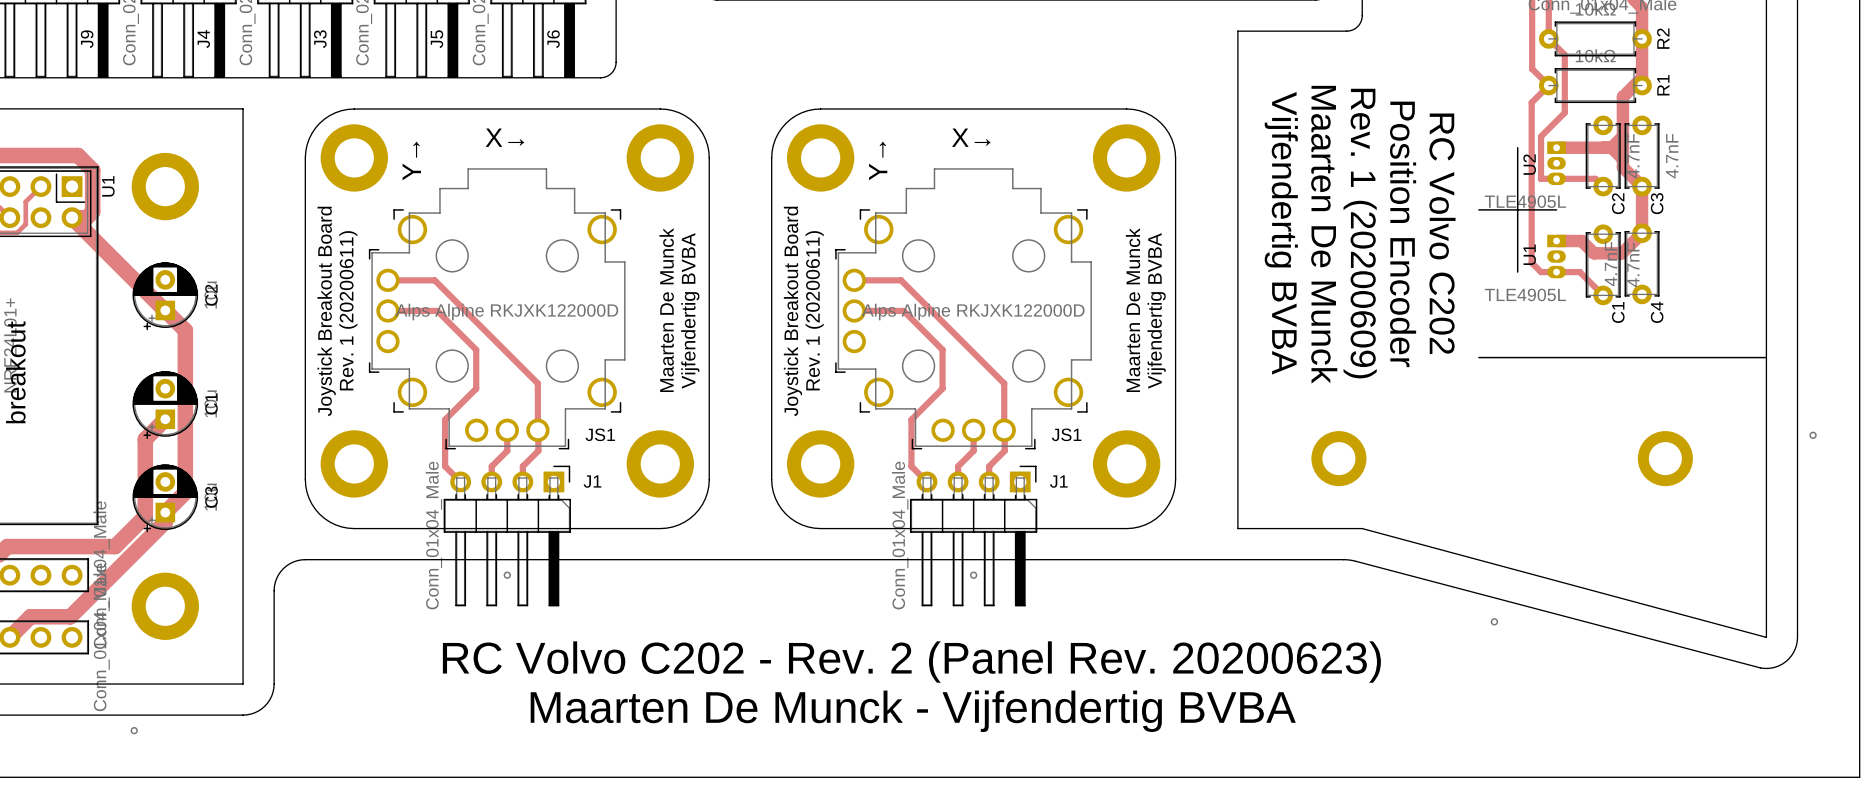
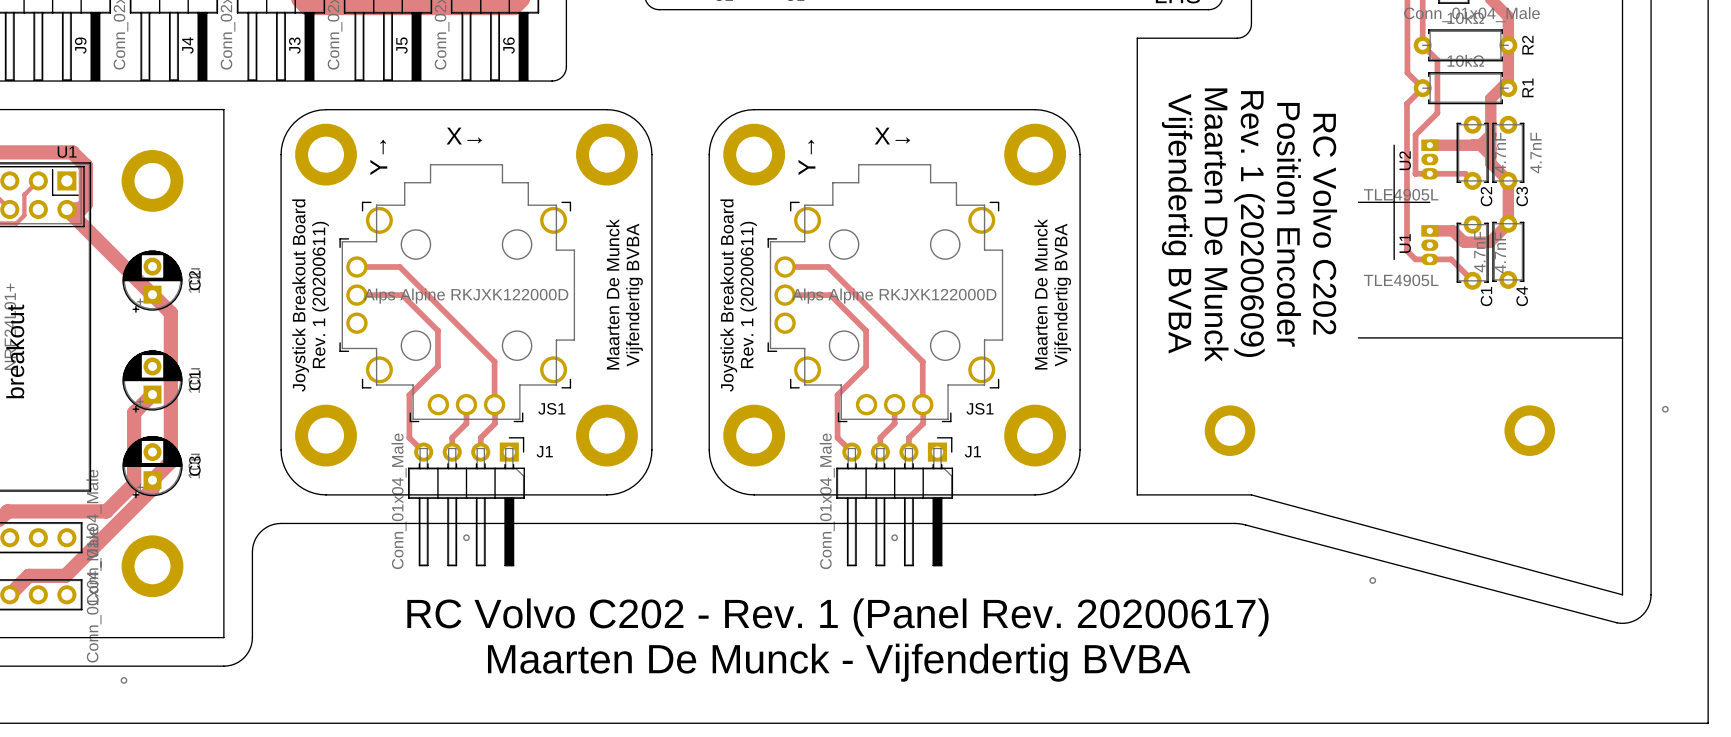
U1 name rotation: 0° (108, 186) -> 90° clockwise (67, 152)
U1 name position: U1 (108, 186) -> U1 (67, 152)
text: RC Volvo C202 - Rev. 2 (Panel Rev. 20200623) (911, 662) -> RC Volvo C202 - Rev. 1 (Panel Rev. 20200617) (837, 617)

